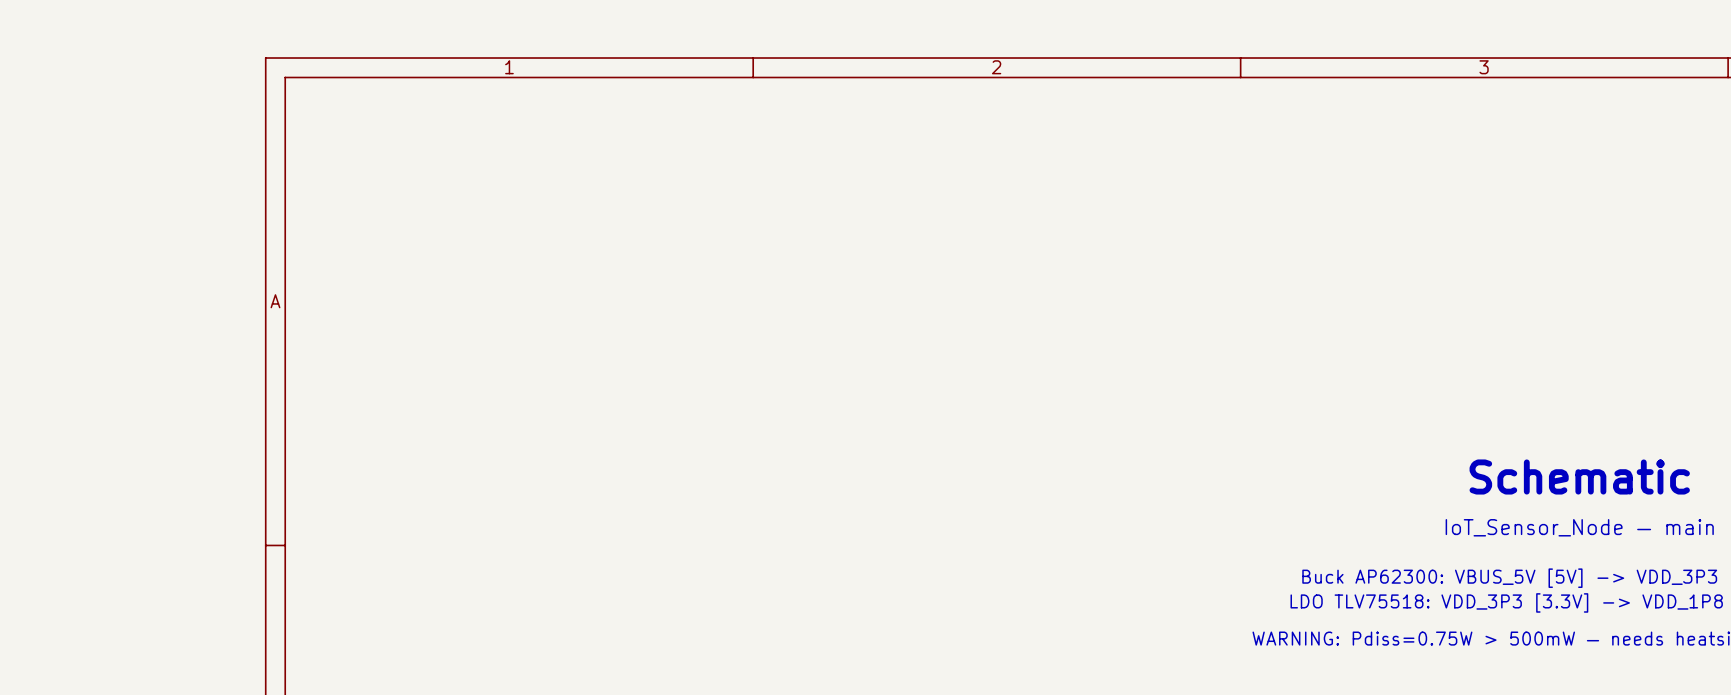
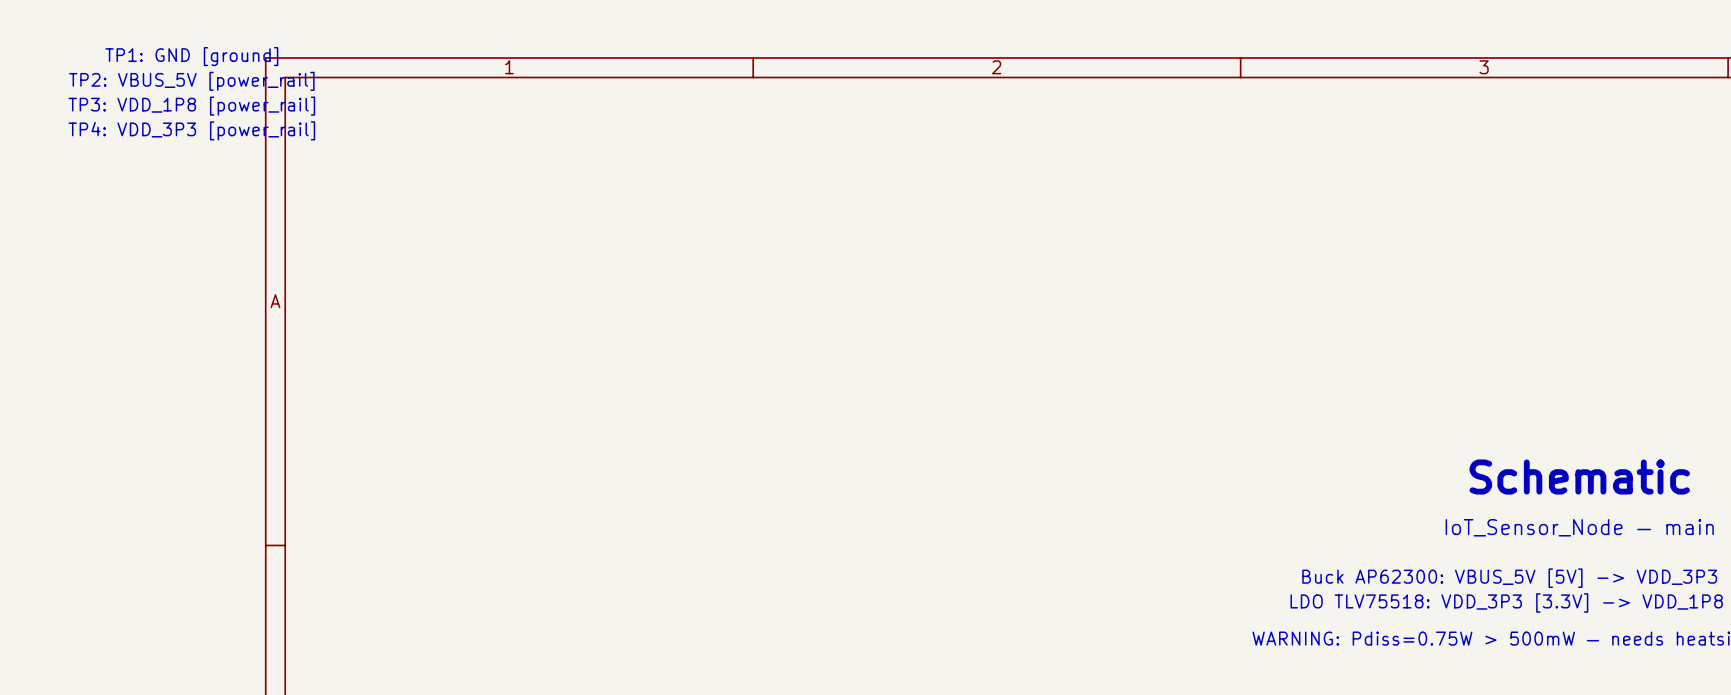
text: none -> TP1: GND [ground] (191, 56)
text: none -> TP2: VBUS_5V [power_rail] (191, 81)
text: none -> TP3: VDD_1P8 [power_rail] (191, 106)
text: none -> TP4: VDD_3P3 [power_rail] (191, 130)

